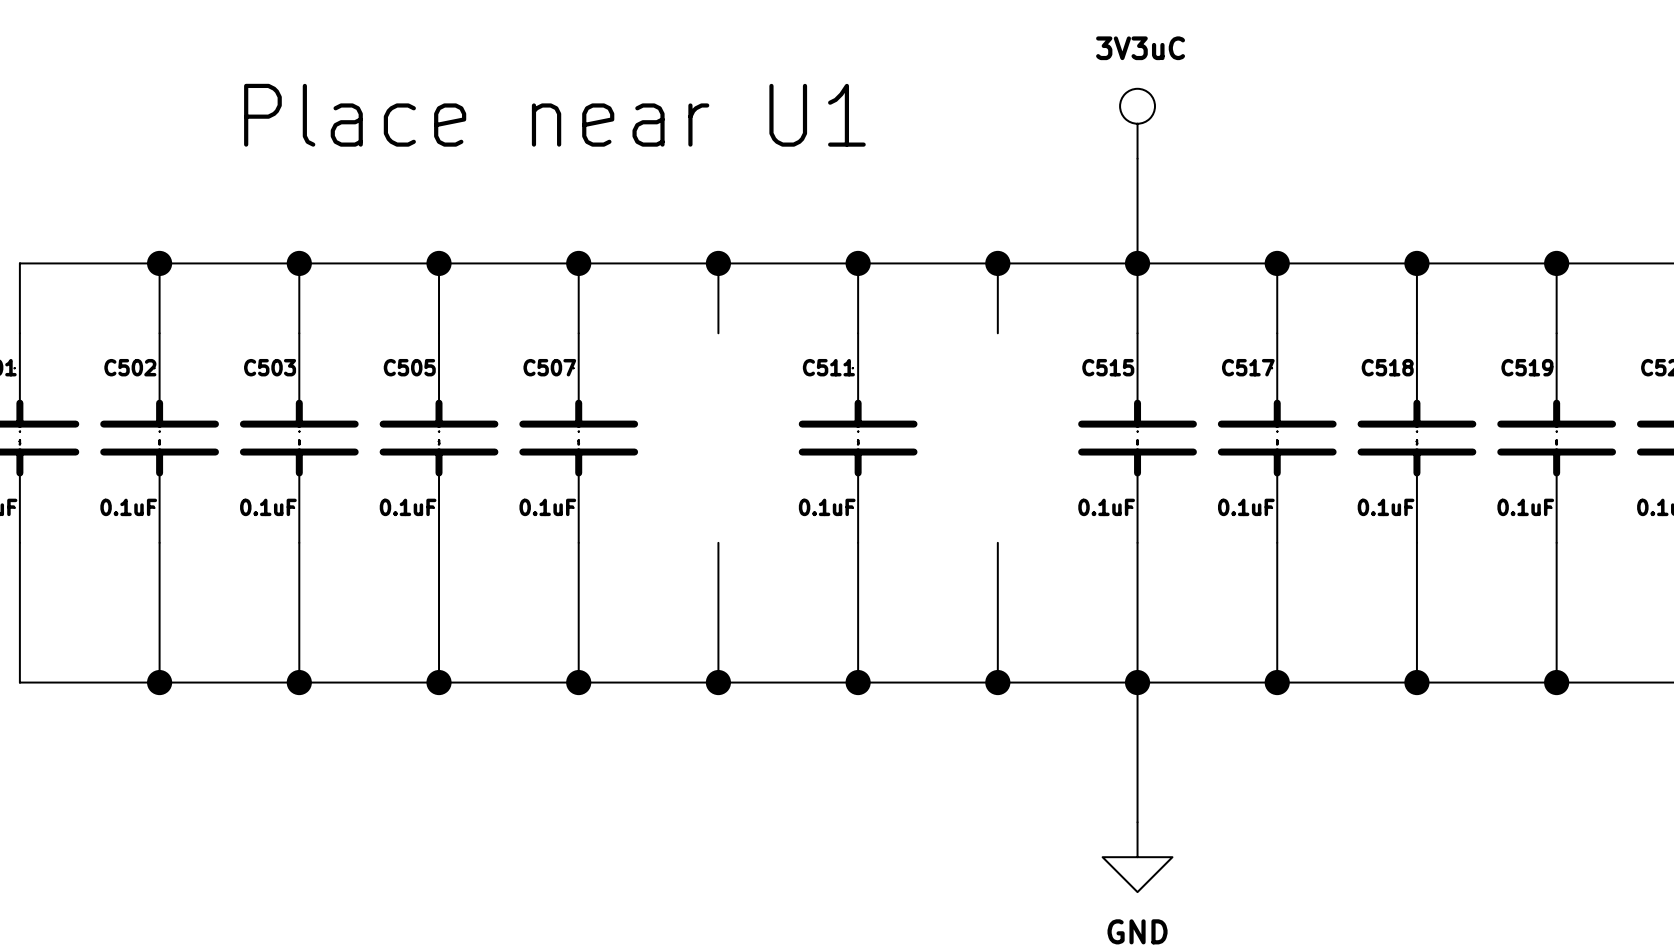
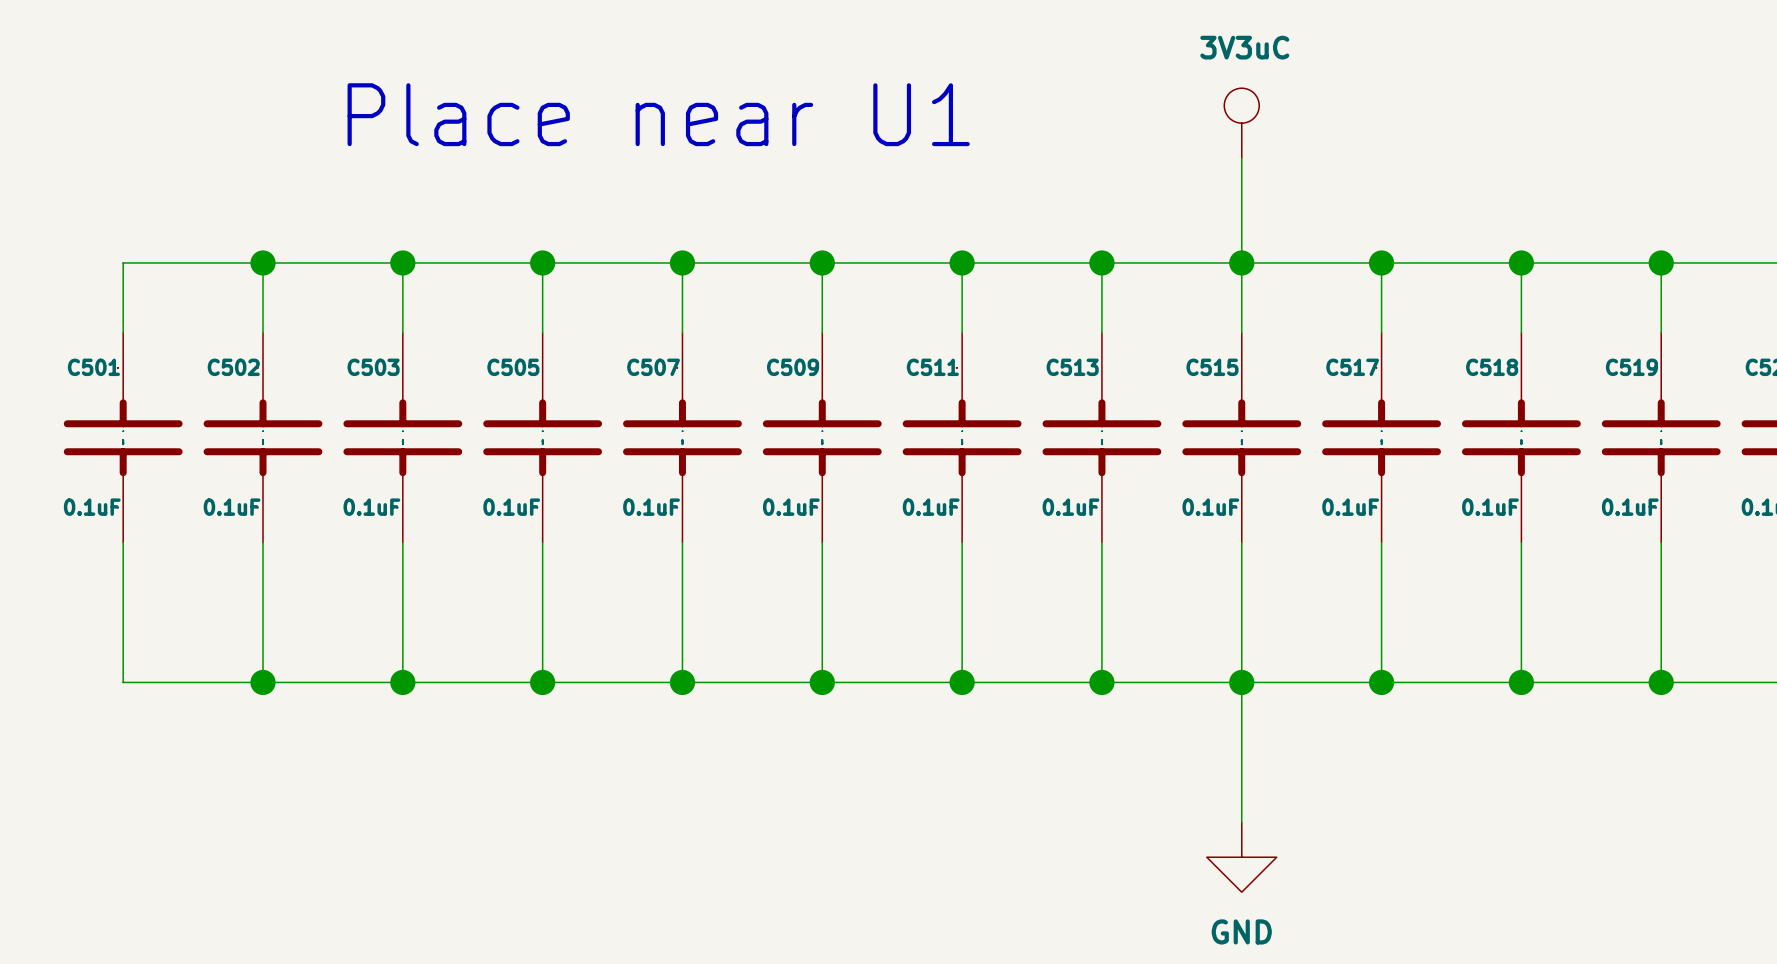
C509: none -> 0.1uF (822, 437)
C513: none -> 0.1uF (1101, 437)

